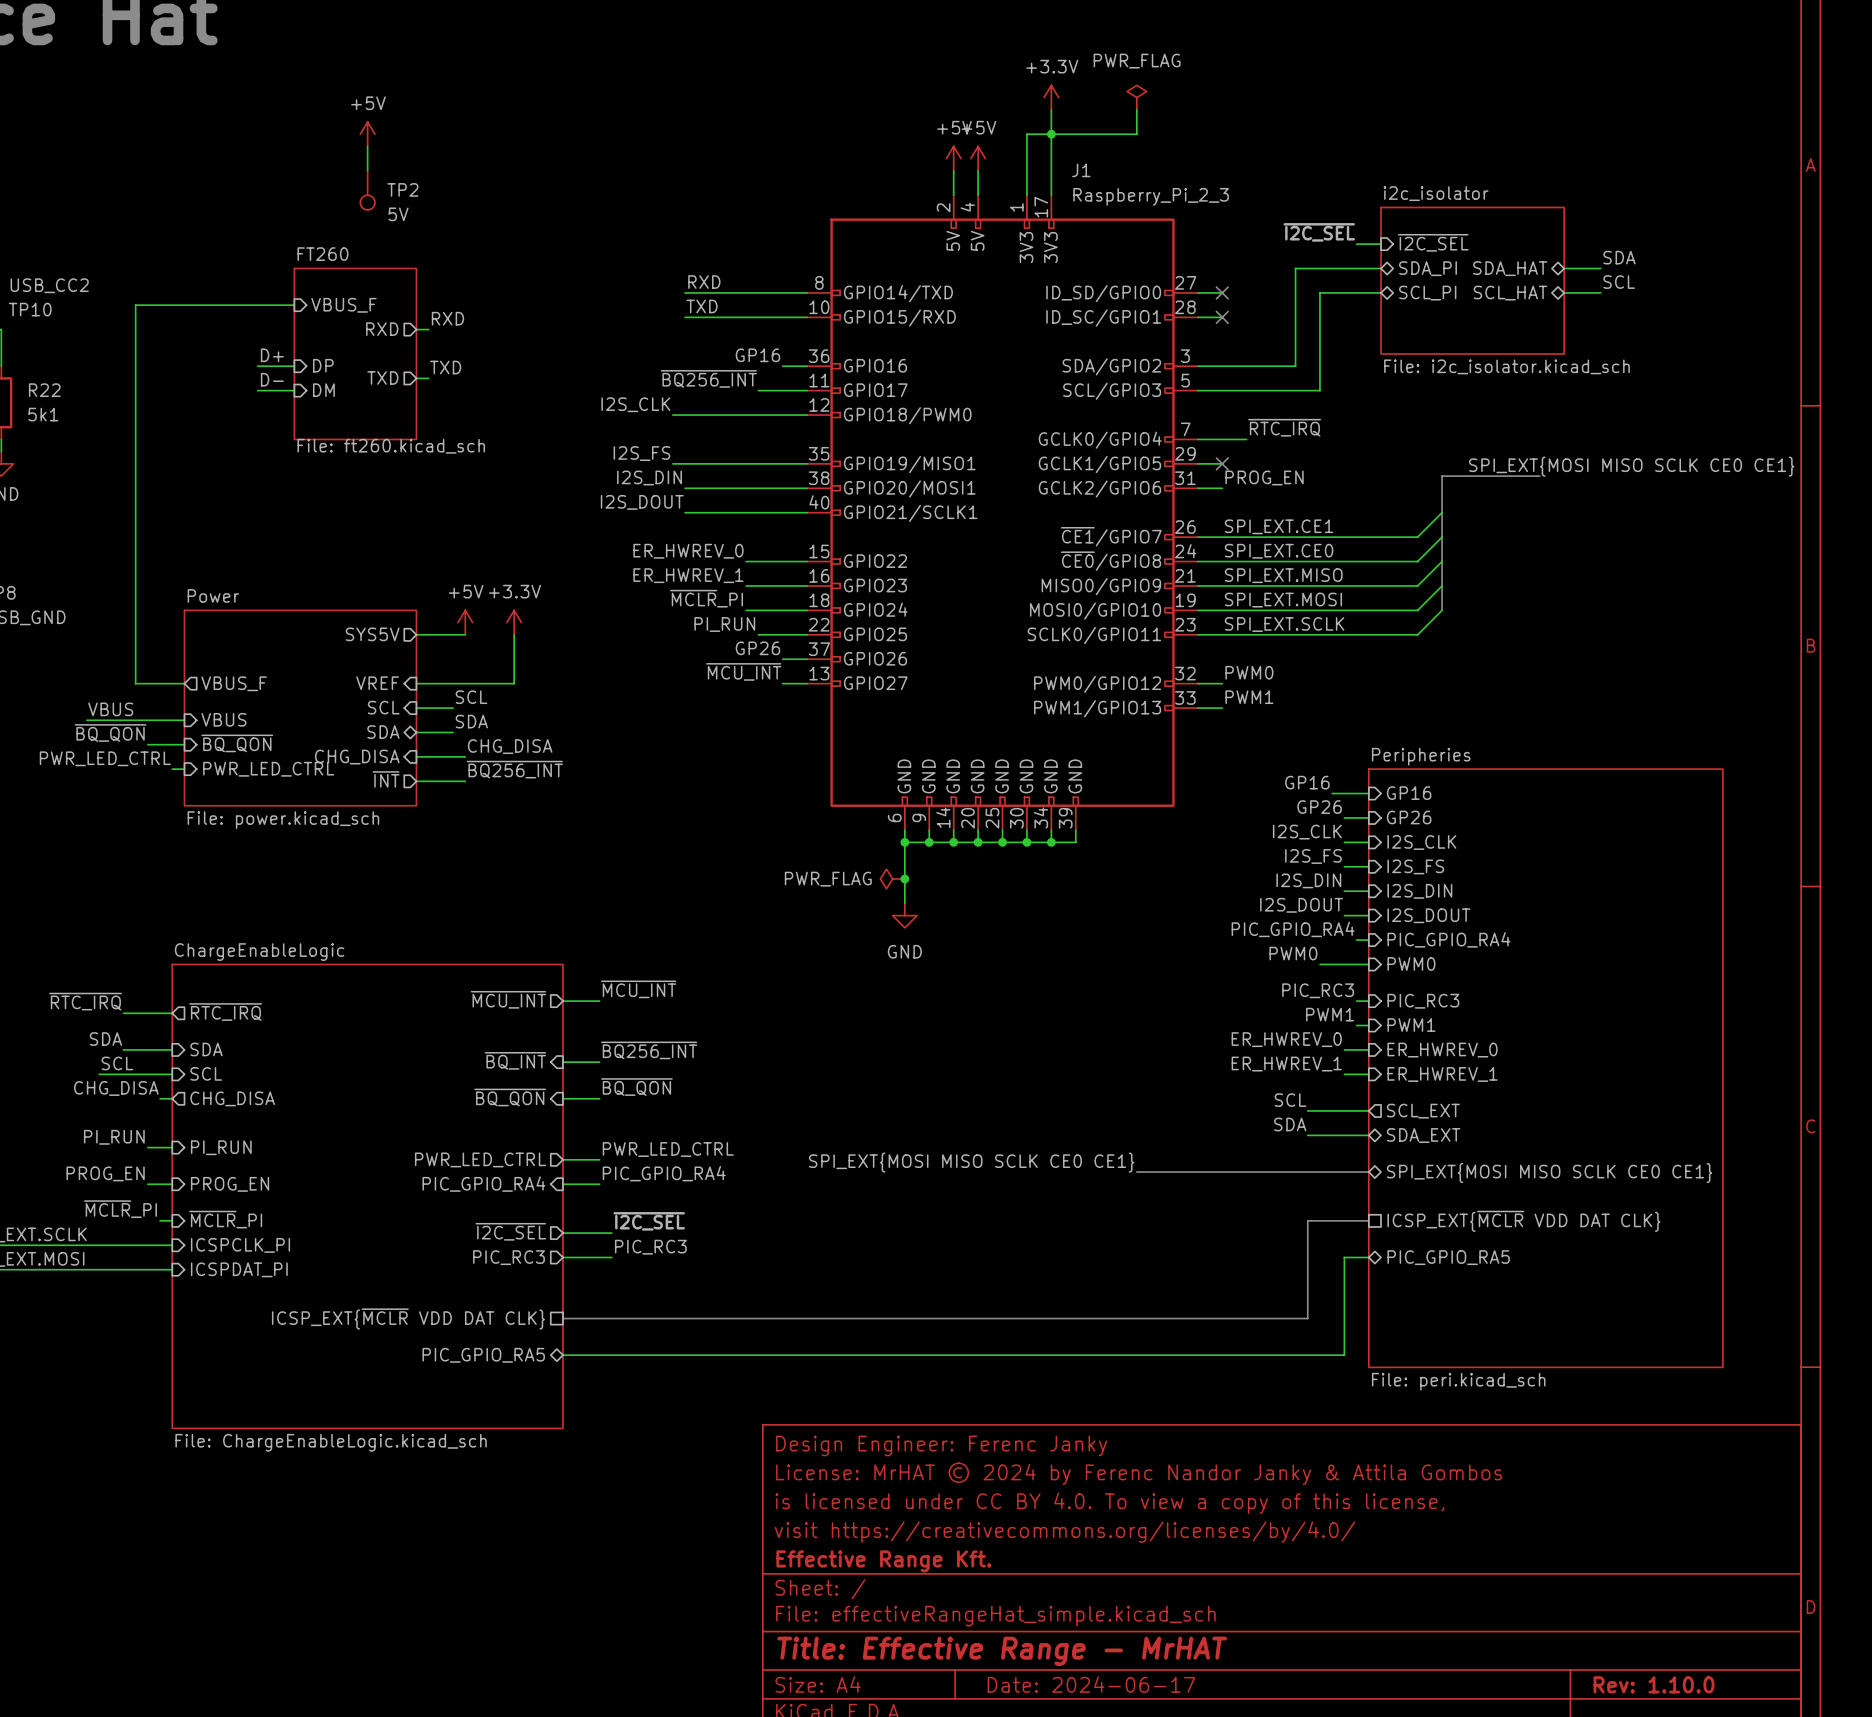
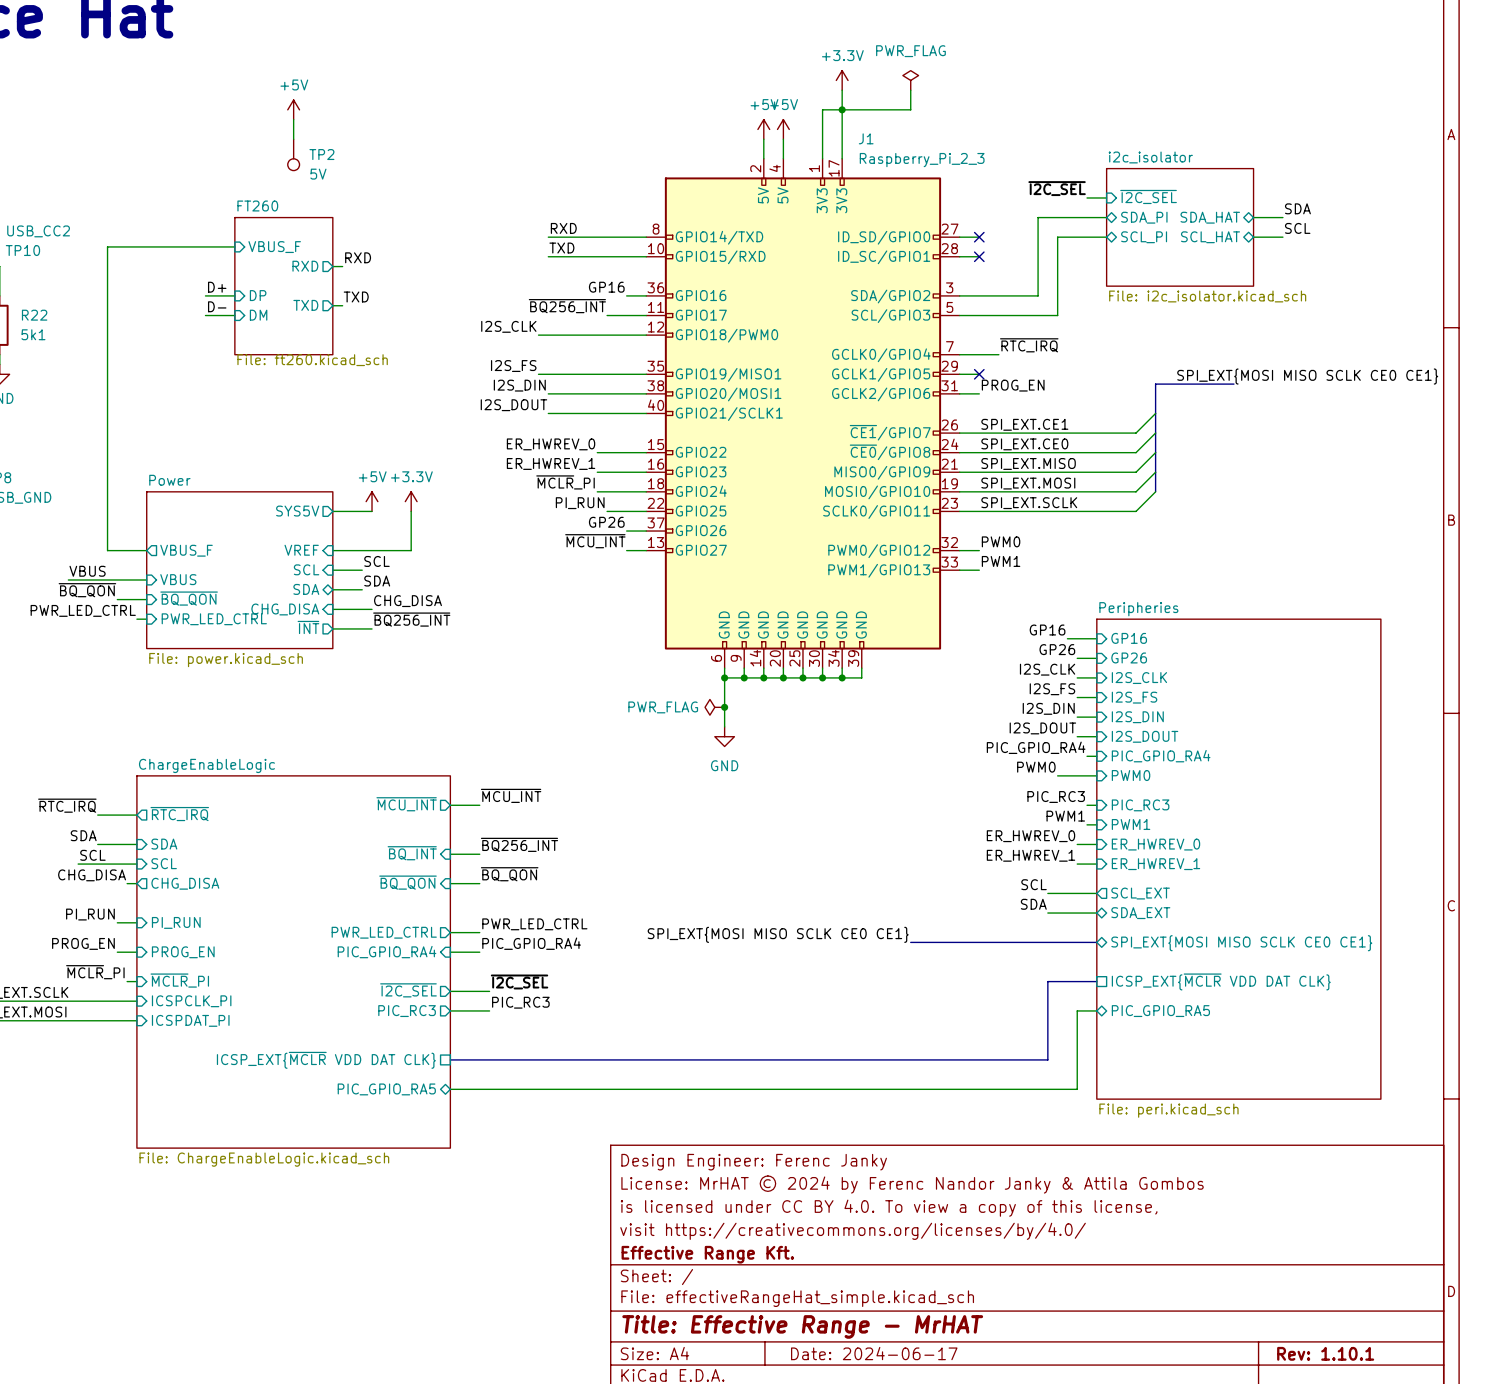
title block: Rev: 1.10.0 (1654, 1684) -> Rev: 1.10.1 (1325, 1353)

